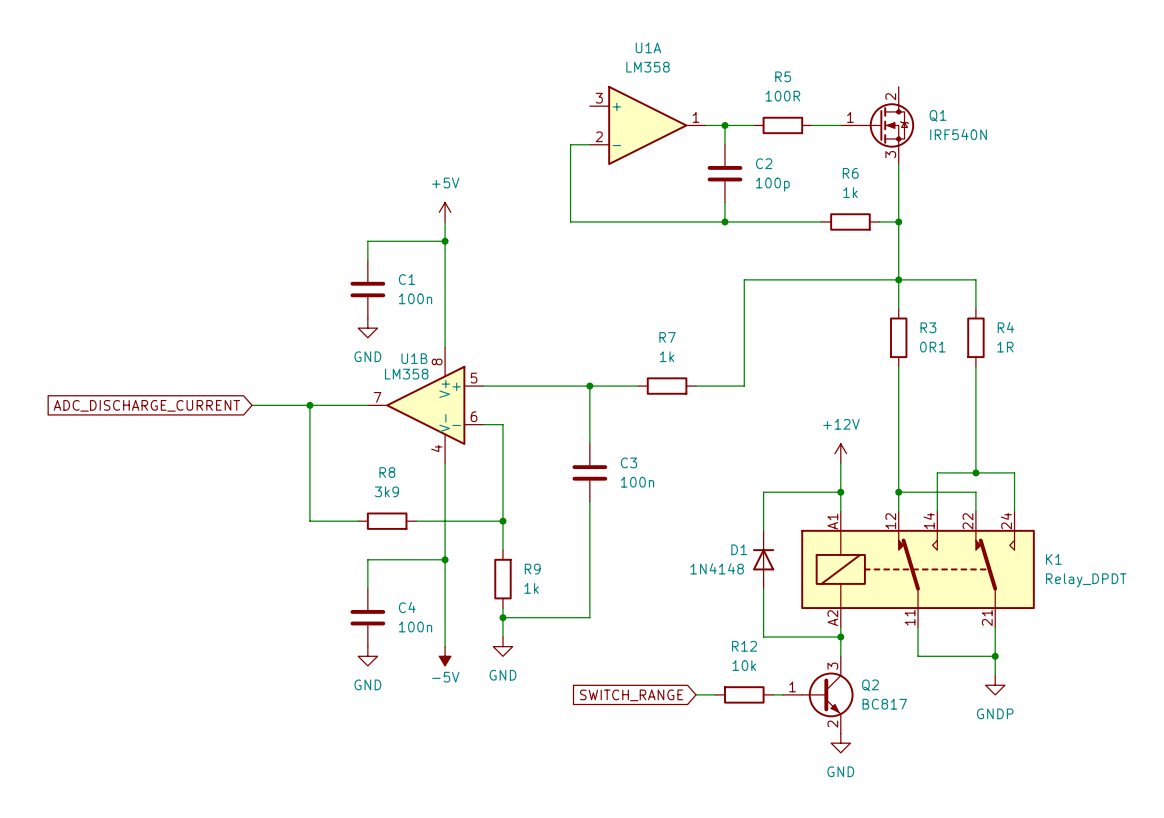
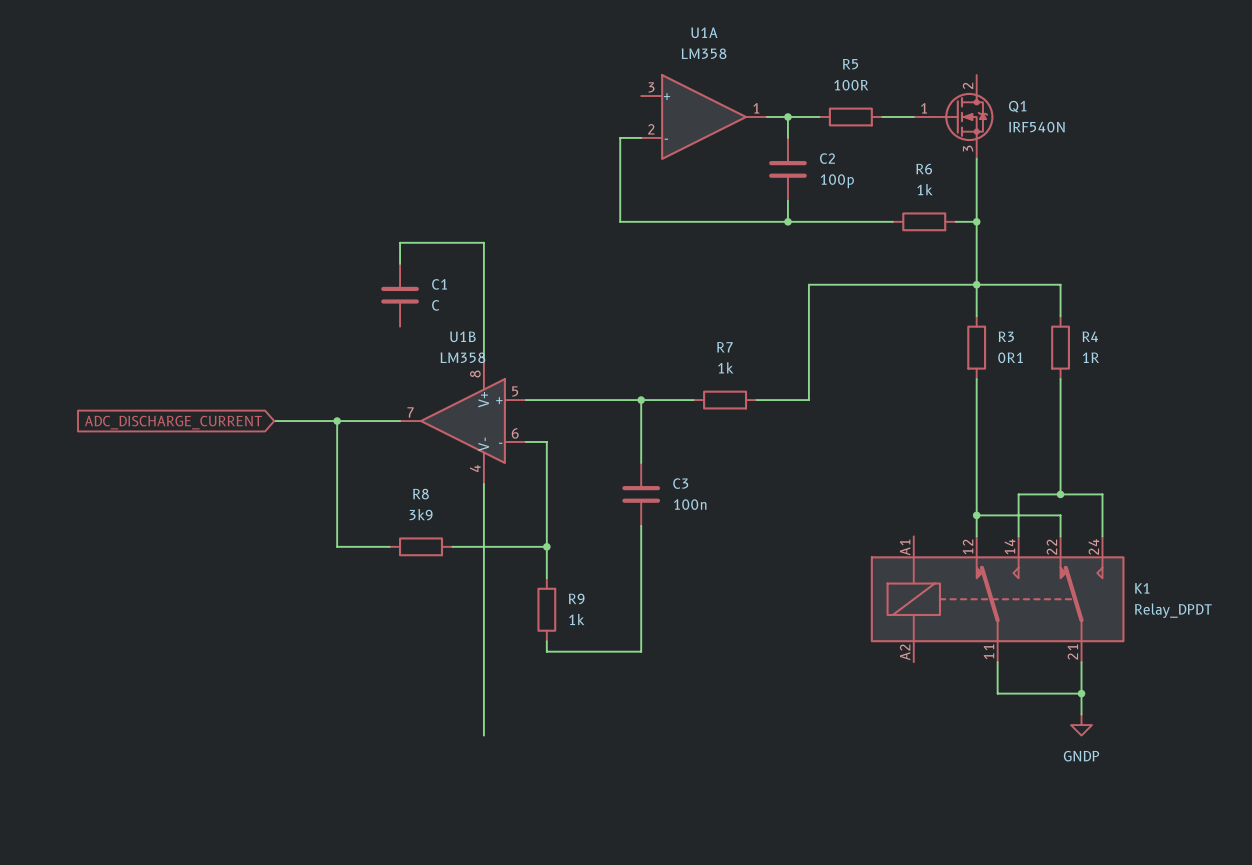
power symbol: +5V (445, 212) -> none
wire: (445, 221) (445, 241) -> none
junction: (445, 241) -> none
C1 value: 100n (415, 298) -> C (435, 305)
power symbol: GND (367, 328) -> none
U1B name position: U1B (414, 358) -> U1B (462, 336)
U1B value position: LM358 (406, 374) -> LM358 (462, 357)
power symbol: +12V (840, 453) -> none
wire: (840, 463) (840, 511) -> none
wire: (840, 492) (763, 492) (763, 530) -> none
junction: (840, 492) -> none
wire: (445, 559) (367, 559) (367, 588) -> none
junction: (445, 559) -> none
D1: 1N4148 (763, 559) -> none
wire: (763, 588) (763, 637) (840, 637) -> none
C4: 100n (367, 617) -> none
wire: (502, 617) (502, 637) -> none
junction: (502, 617) -> none
wire: (840, 627) (840, 656) -> none
junction: (840, 637) -> none
wire: none -> (483, 683) (483, 735)
power symbol: GND (502, 646) -> none
power symbol: GND (367, 656) -> none
power symbol: -5V (445, 656) -> none
wire: (696, 694) (715, 694) -> none
R12: 10k (744, 694) -> none
wire: (773, 694) (782, 694) -> none
Q2: BC817 (818, 694) -> none
global label: SWITCH_RANGE (631, 695) -> none
power symbol: GND (840, 743) -> none

